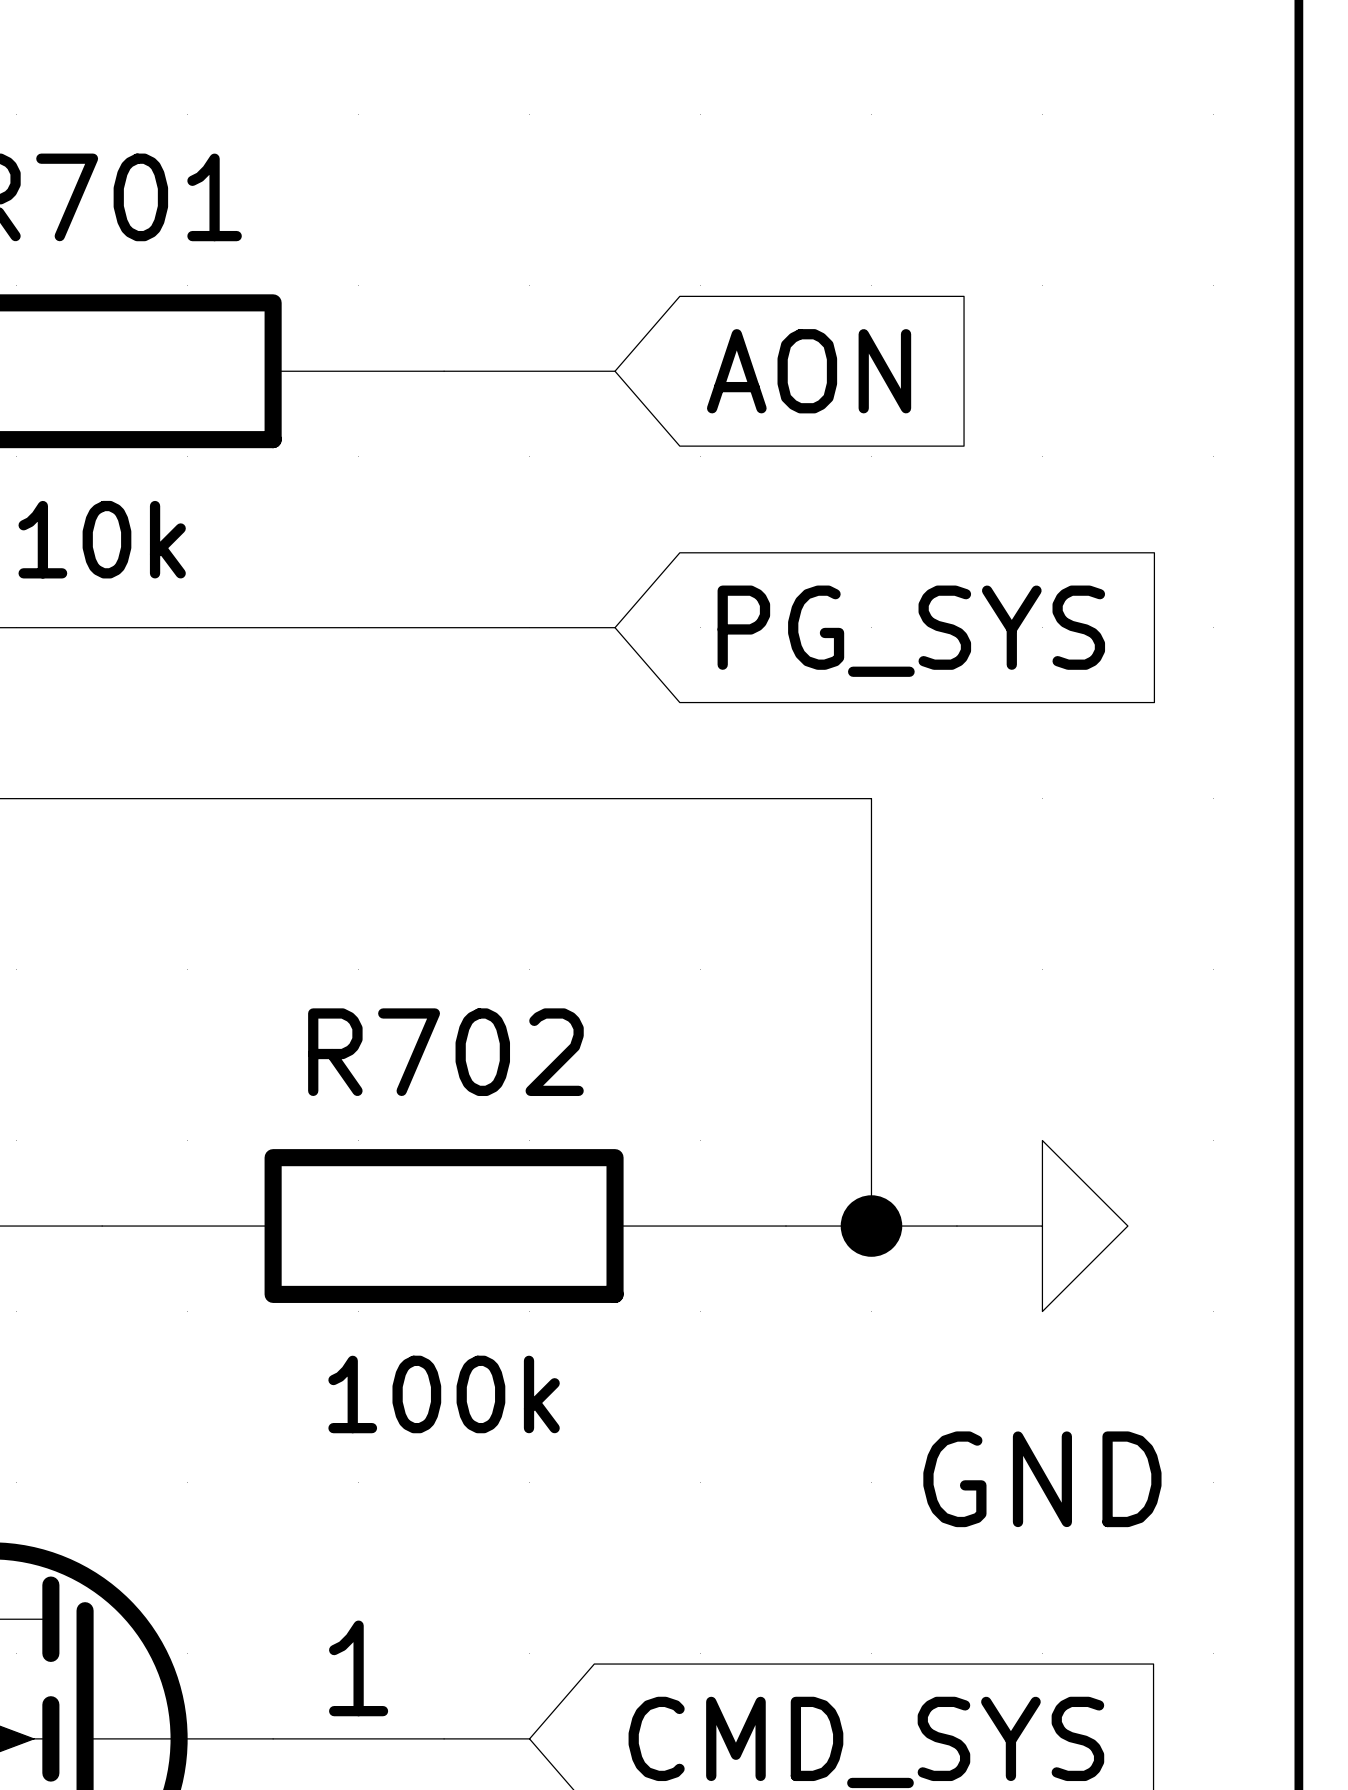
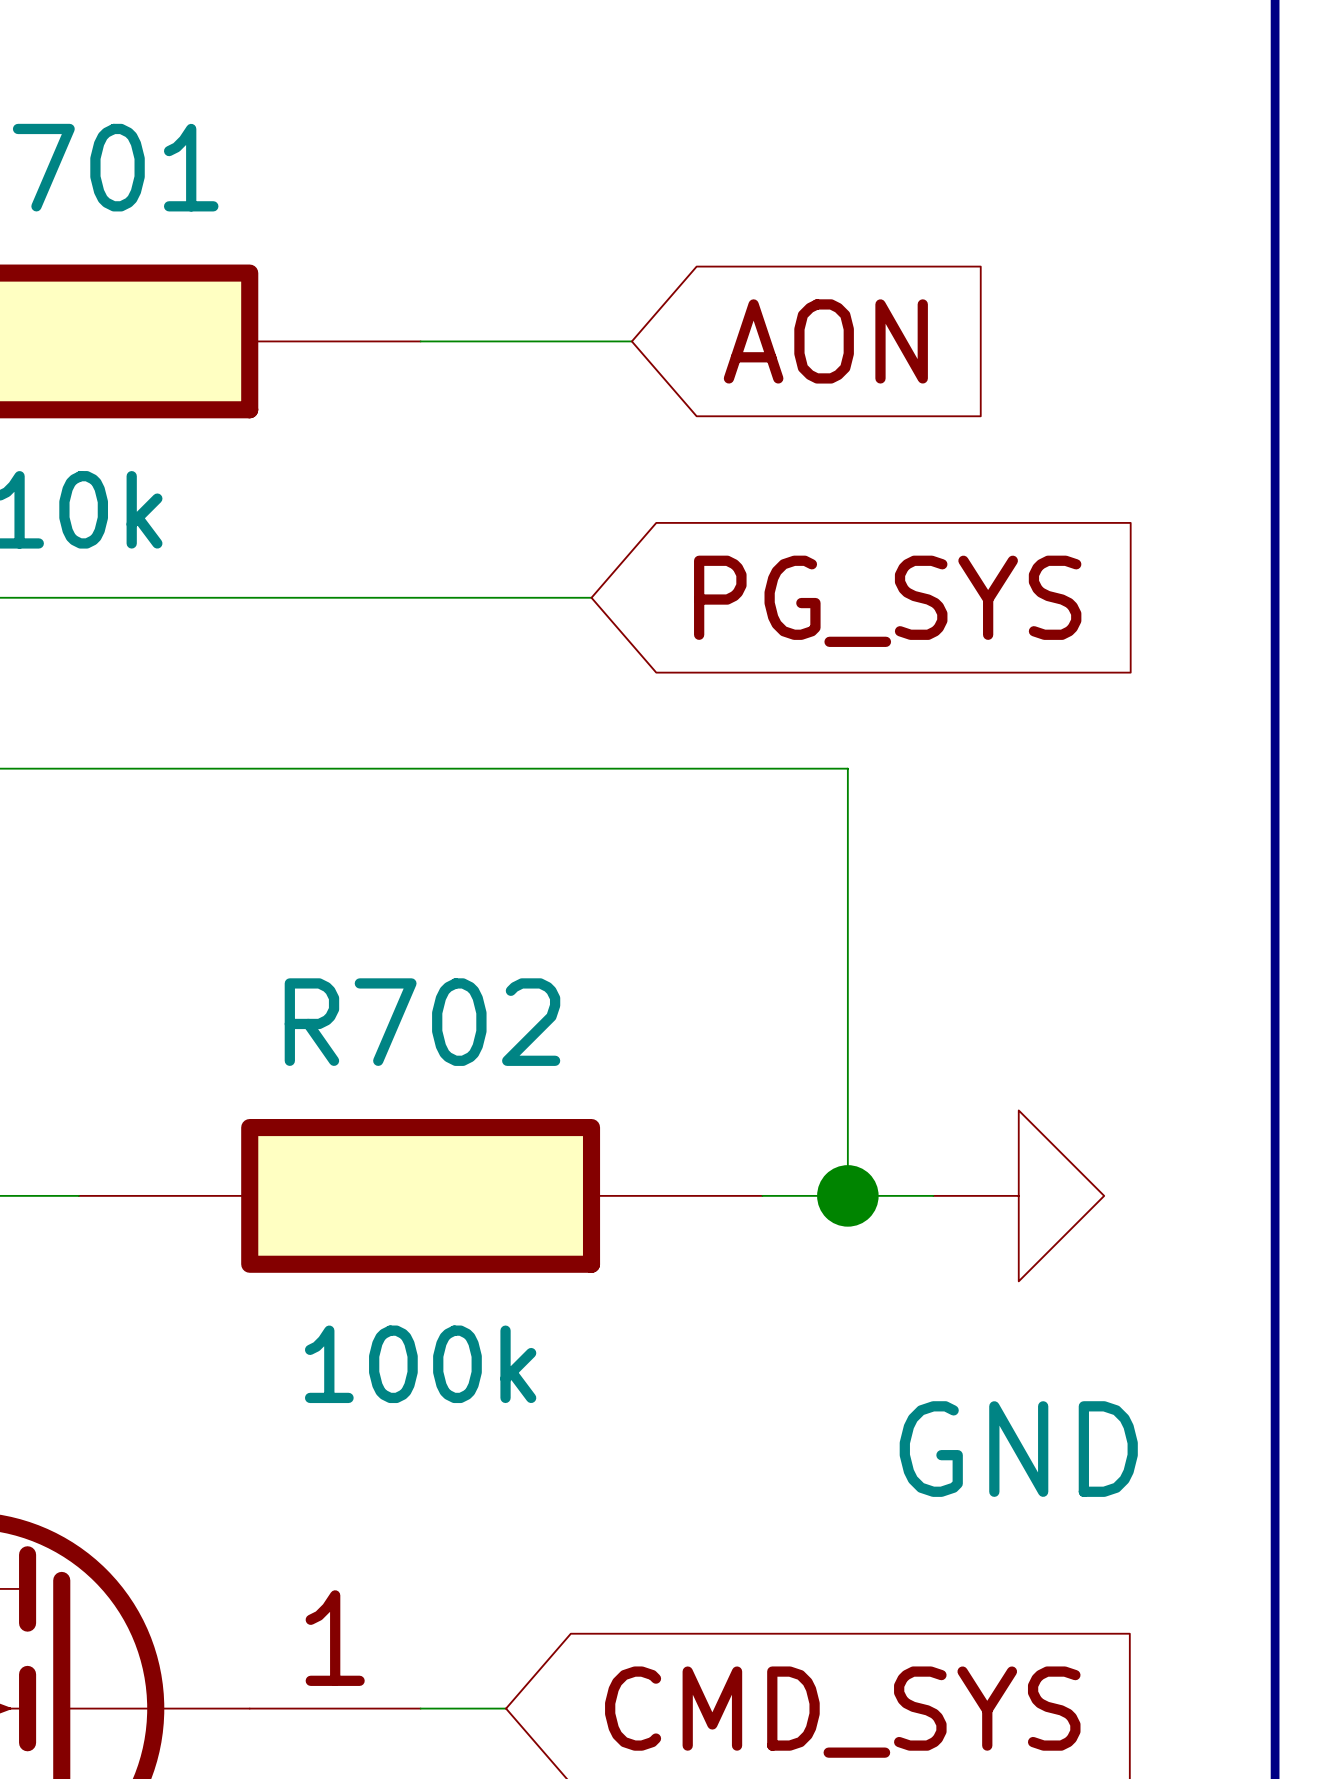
wire: none -> (591, 341) (631, 341)
global label position: AON (809, 371) -> AON (825, 341)

